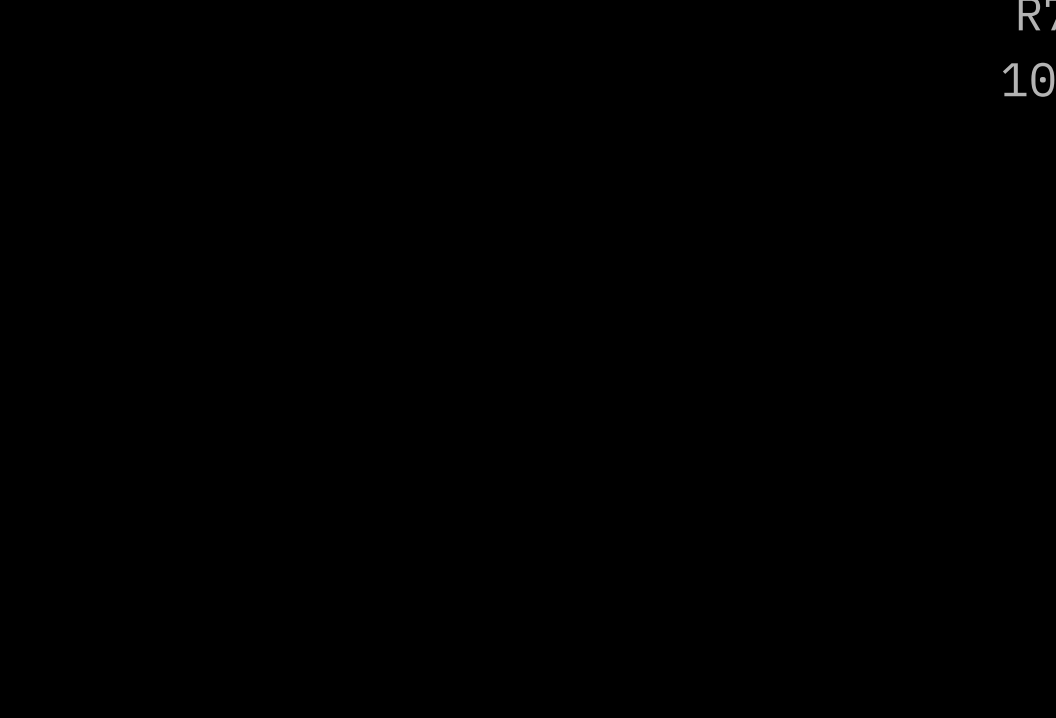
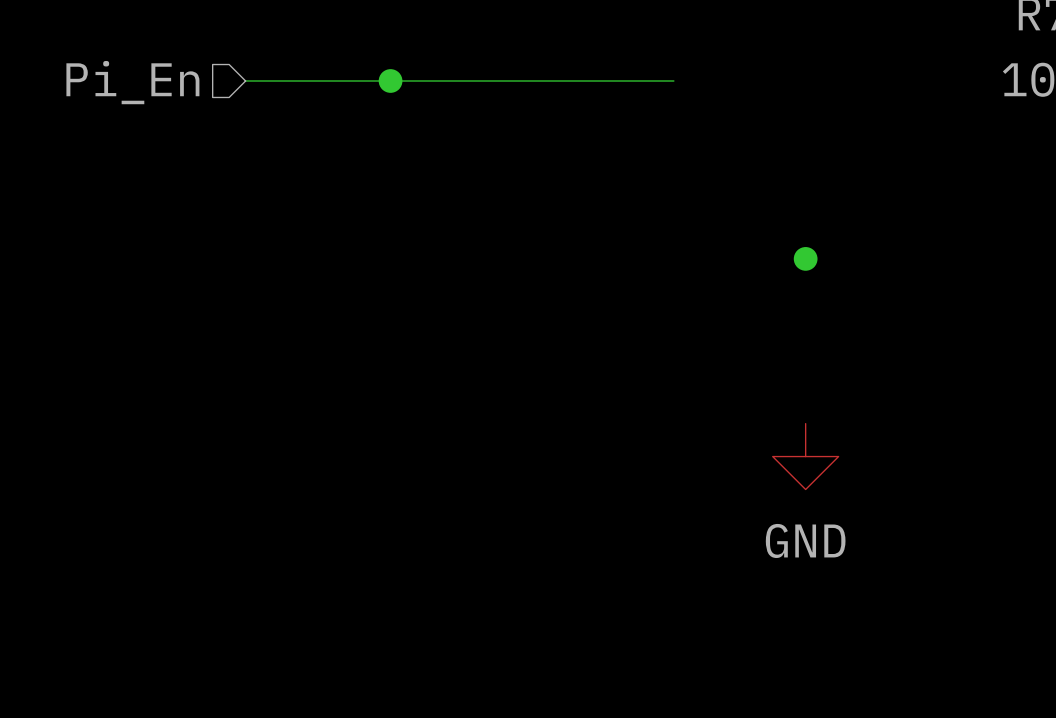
wire: none -> (245, 80) (673, 80)
junction: none -> (390, 80)
hierarchical label: none -> Pi_En (132, 82)
junction: none -> (805, 258)
power symbol: none -> GND (805, 456)

